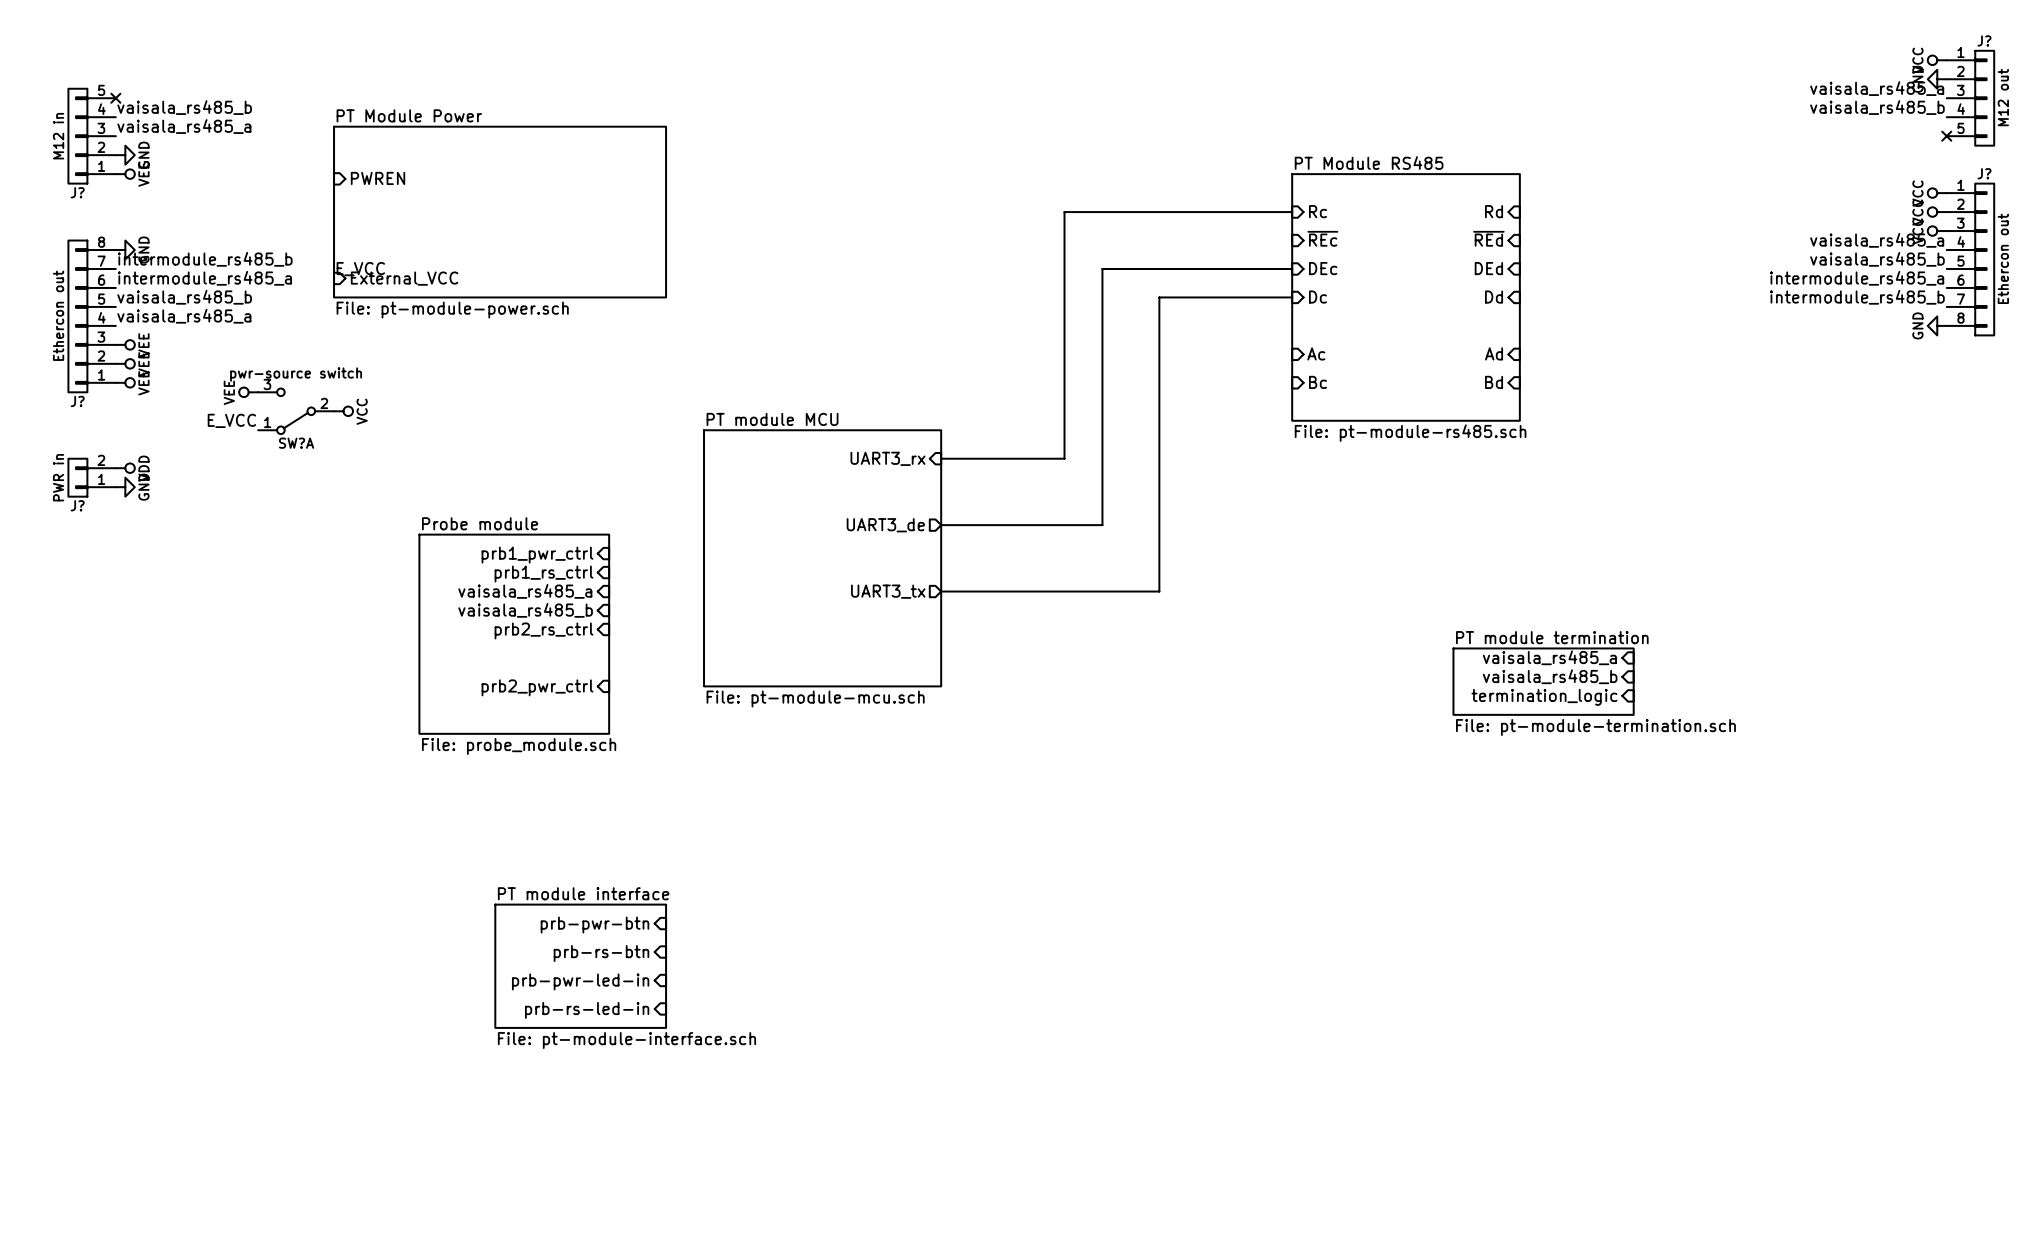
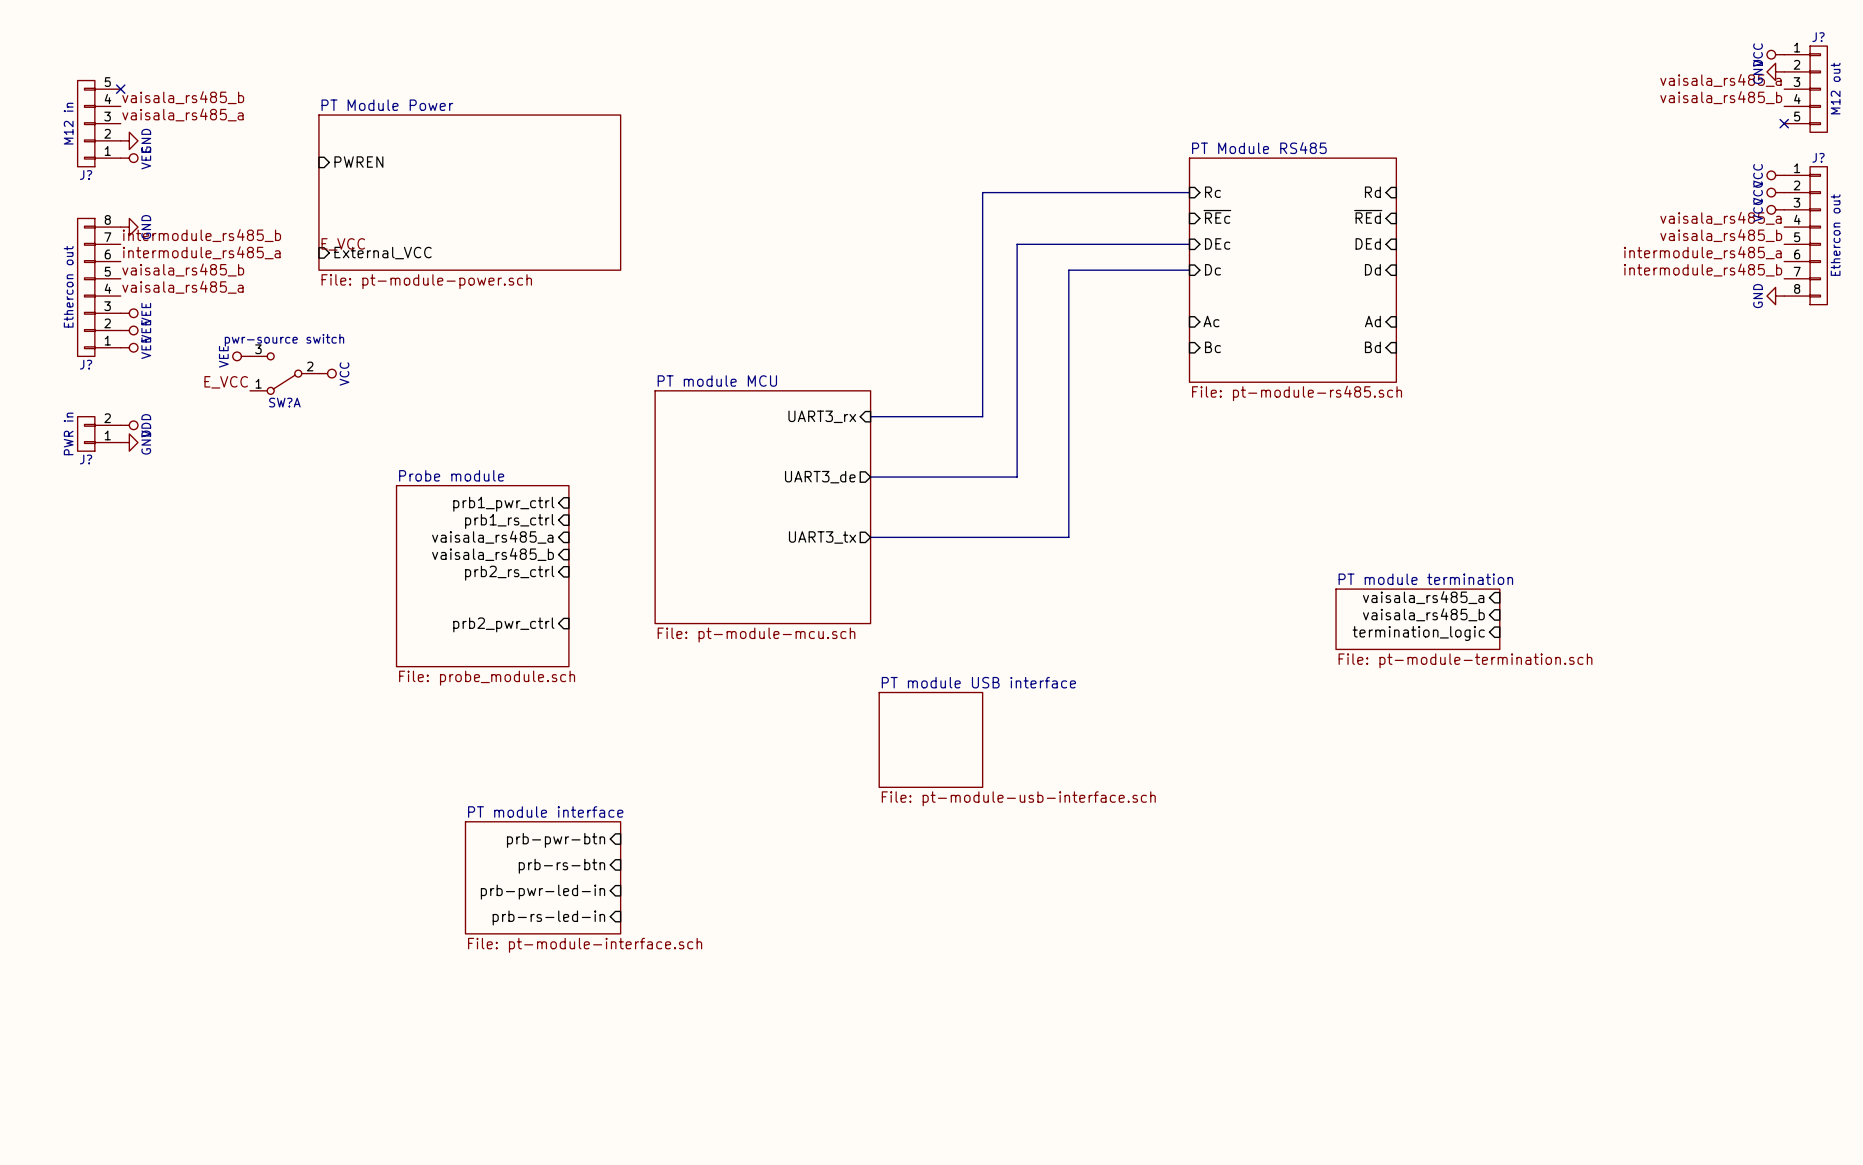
sheet PT module USB interface: none -> File: pt-module-usb-interface.sch (930, 739)

